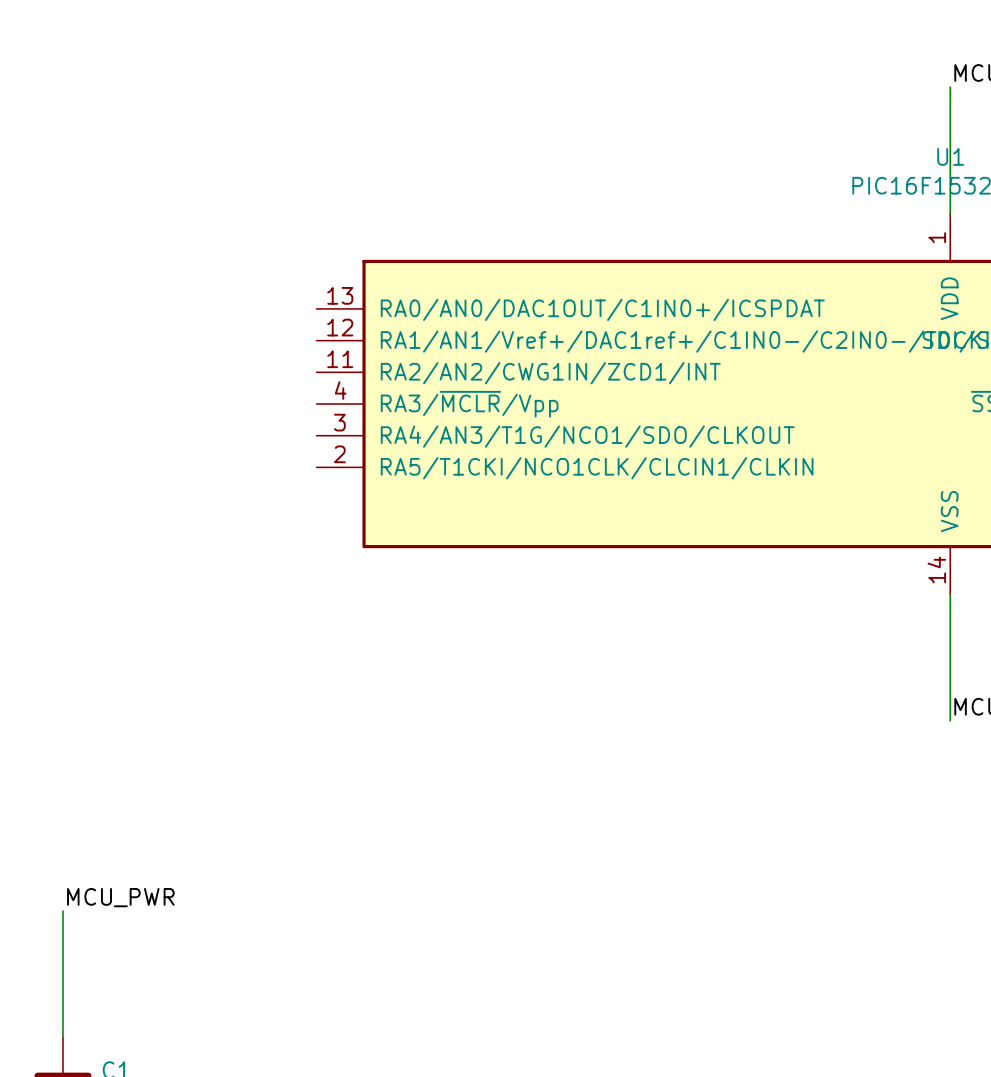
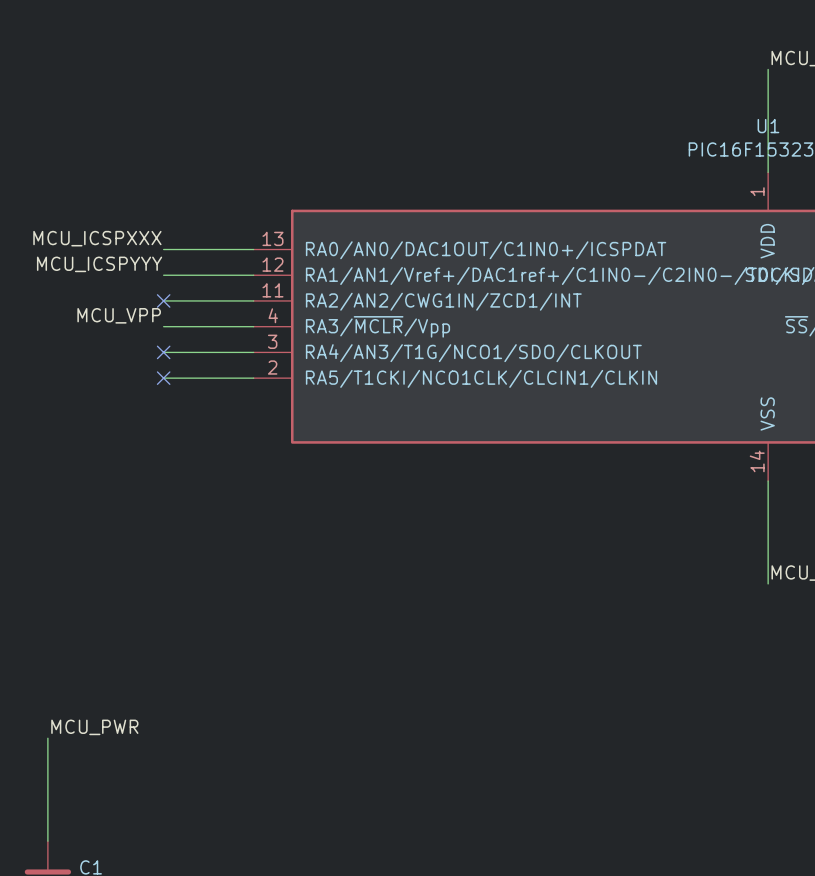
label: none -> MCU_ICSPXXX (97, 238)
wire: none -> (163, 249) (253, 249)
label: none -> MCU_ICSPYYY (99, 264)
wire: none -> (163, 275) (253, 275)
wire: none -> (163, 300) (253, 300)
no-connect mark: none -> (163, 300)
label: none -> MCU_VPP (119, 315)
wire: none -> (163, 326) (253, 326)
wire: none -> (163, 352) (253, 352)
no-connect mark: none -> (163, 352)
wire: none -> (163, 378) (253, 378)
no-connect mark: none -> (163, 378)

